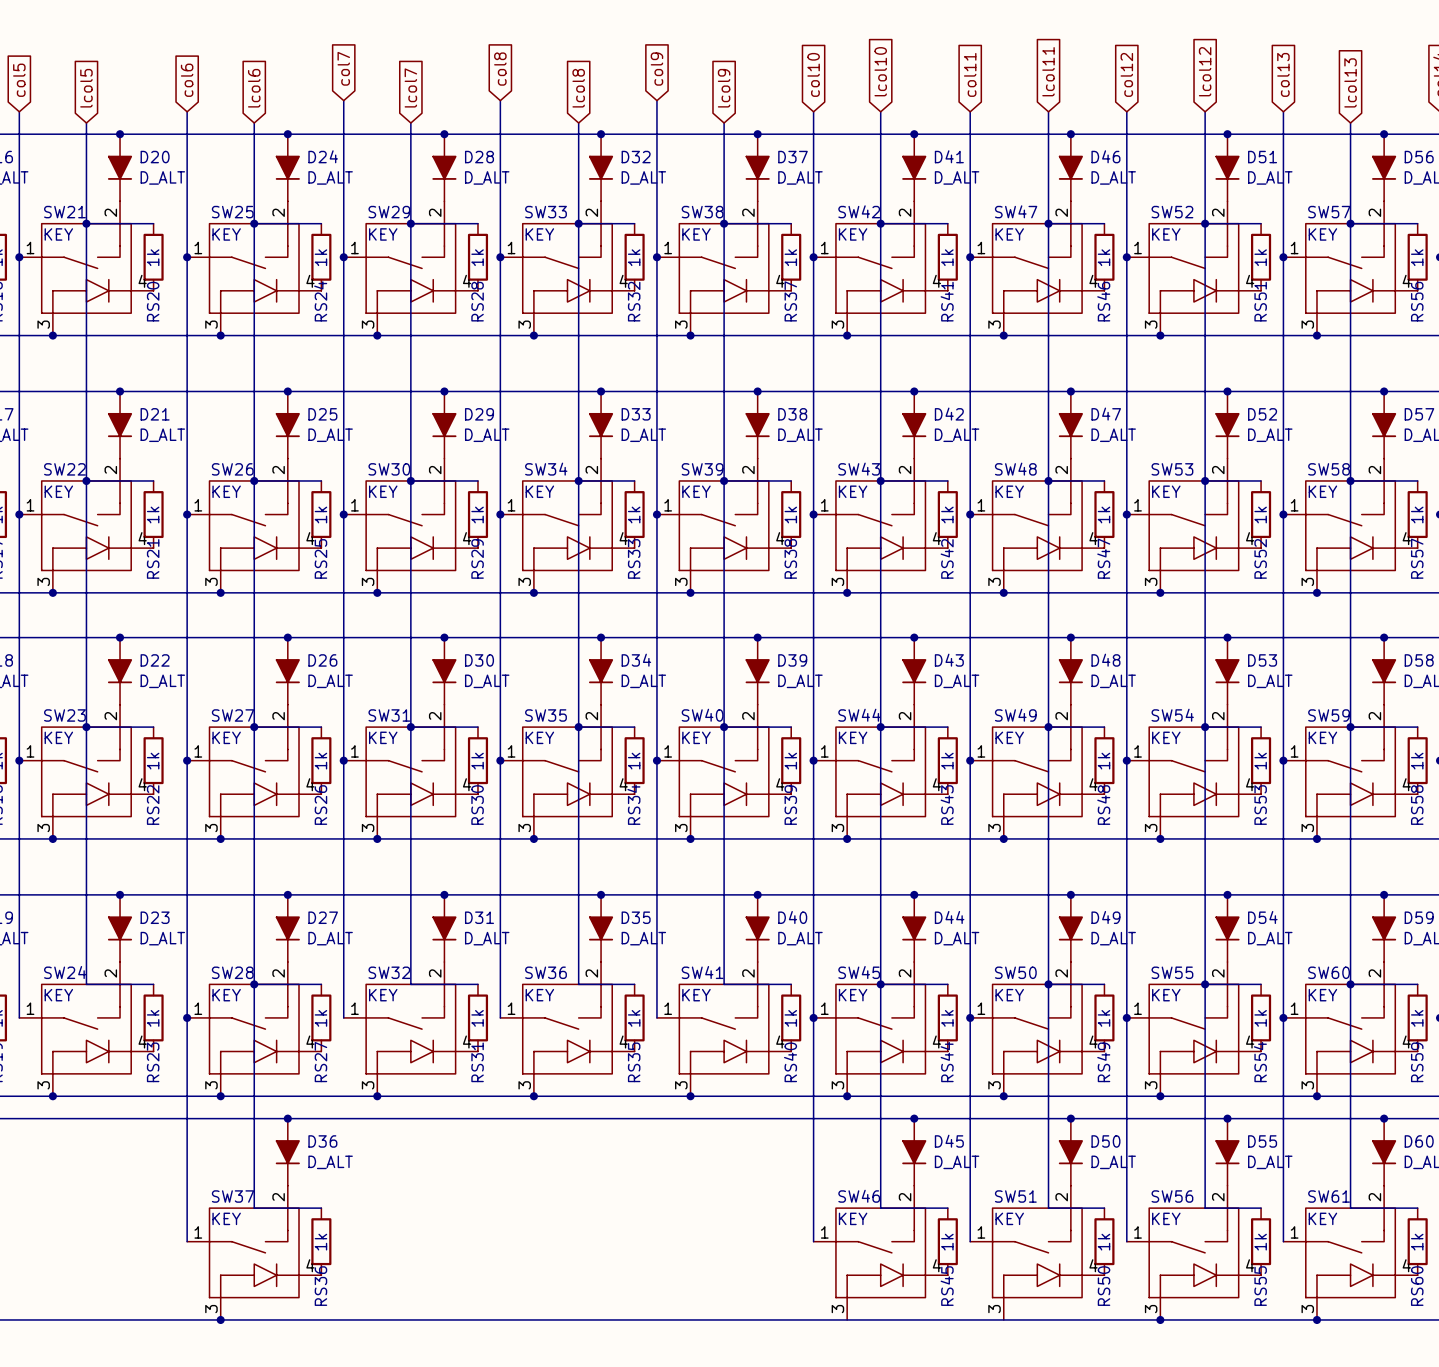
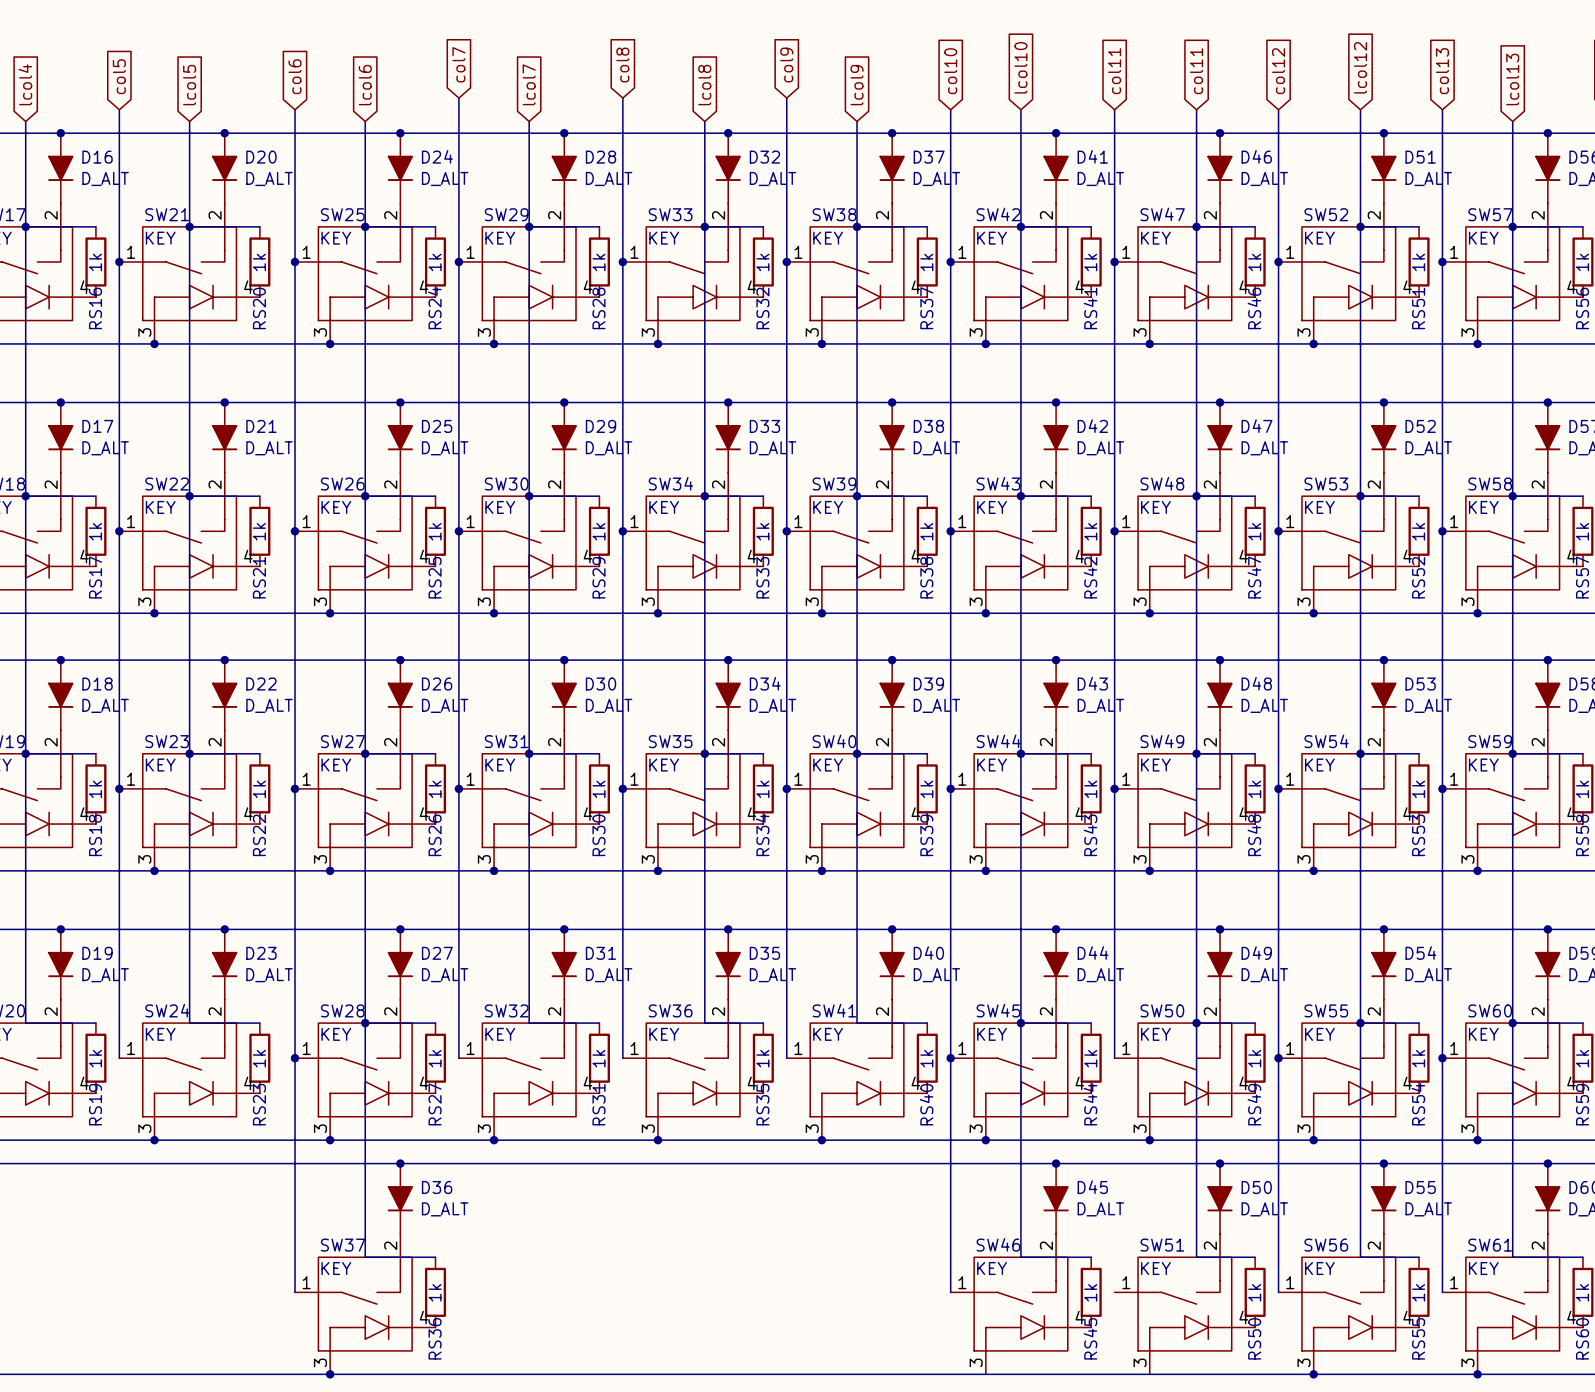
global label: lcol11 (1048, 71) -> col11 (1196, 71)
wire: (970, 1017) (970, 1241) -> none
junction: (970, 1017) -> none

